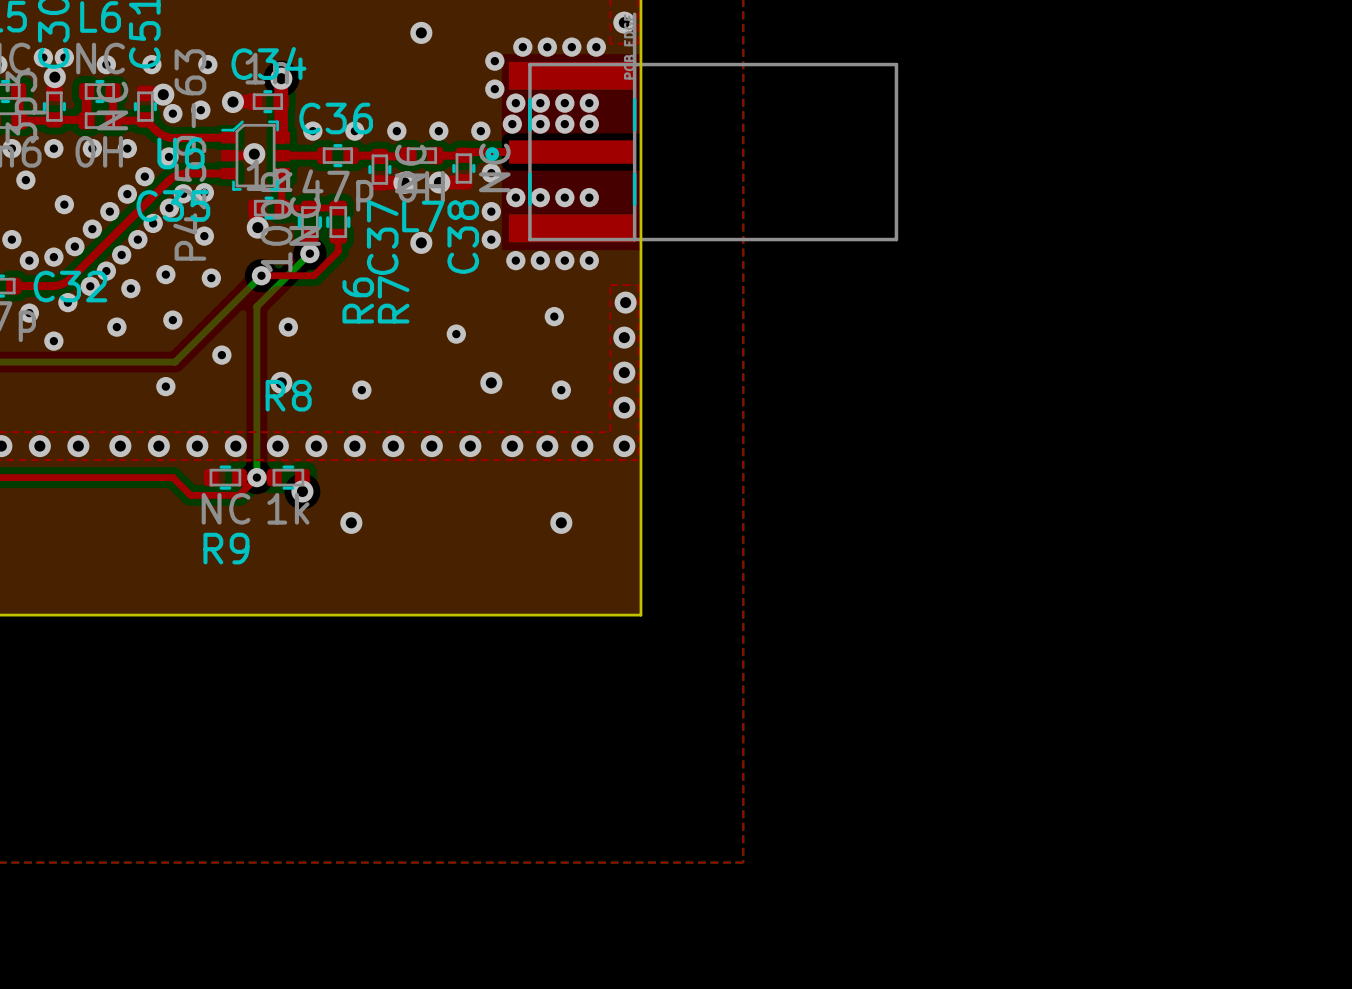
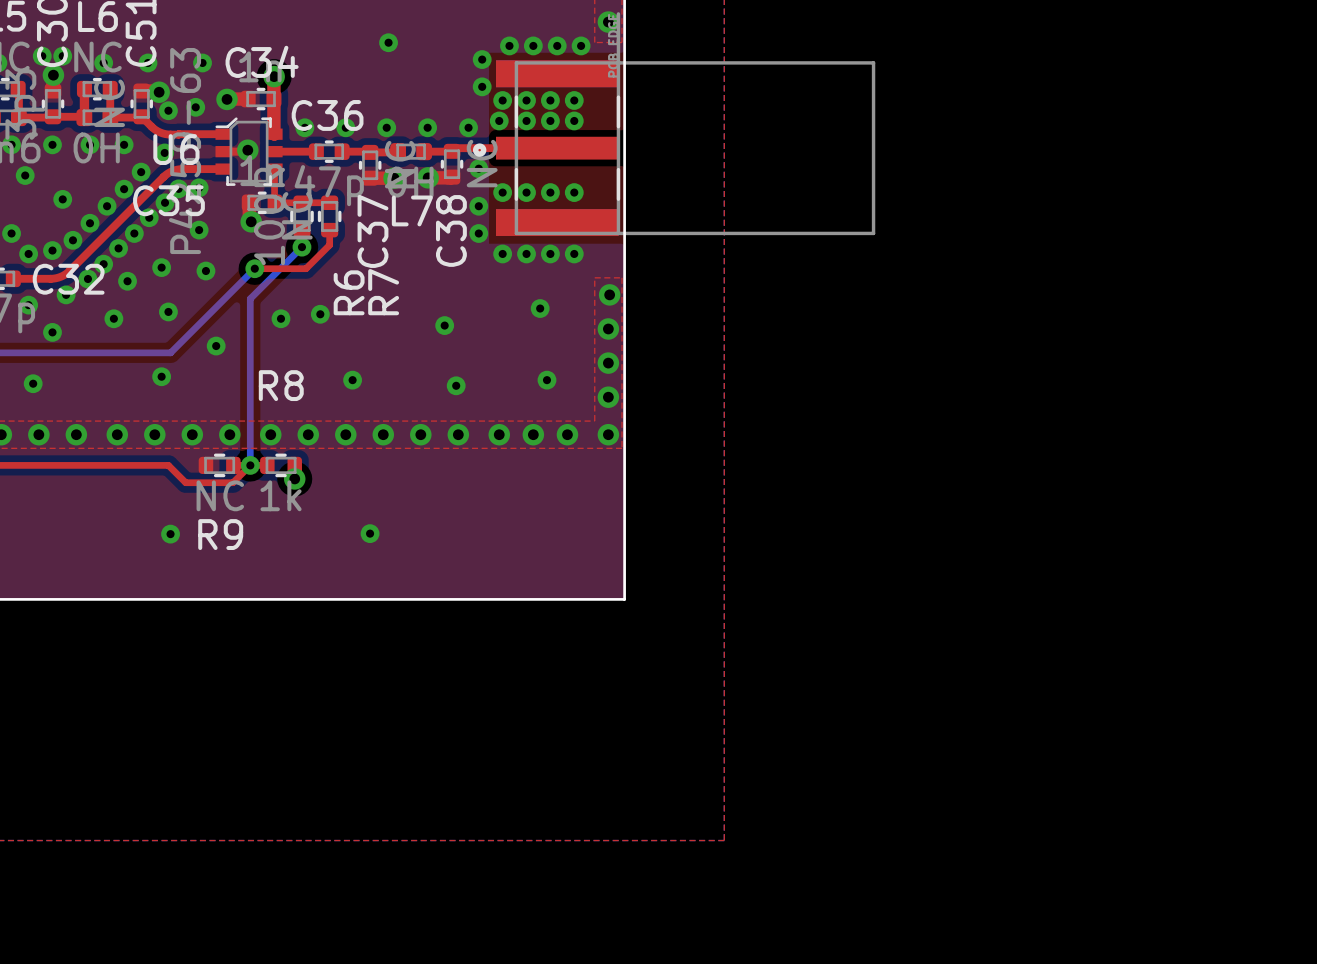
via: (421, 32) -> none
via: none -> (388, 42)
via: (421, 242) -> none
via: none -> (320, 314)
via: (281, 382) -> none
via: (491, 382) -> none
via: none -> (33, 383)
via: none -> (456, 385)
via: (351, 522) -> none
via: (561, 522) -> none
via: none -> (370, 533)
via: none -> (170, 534)

